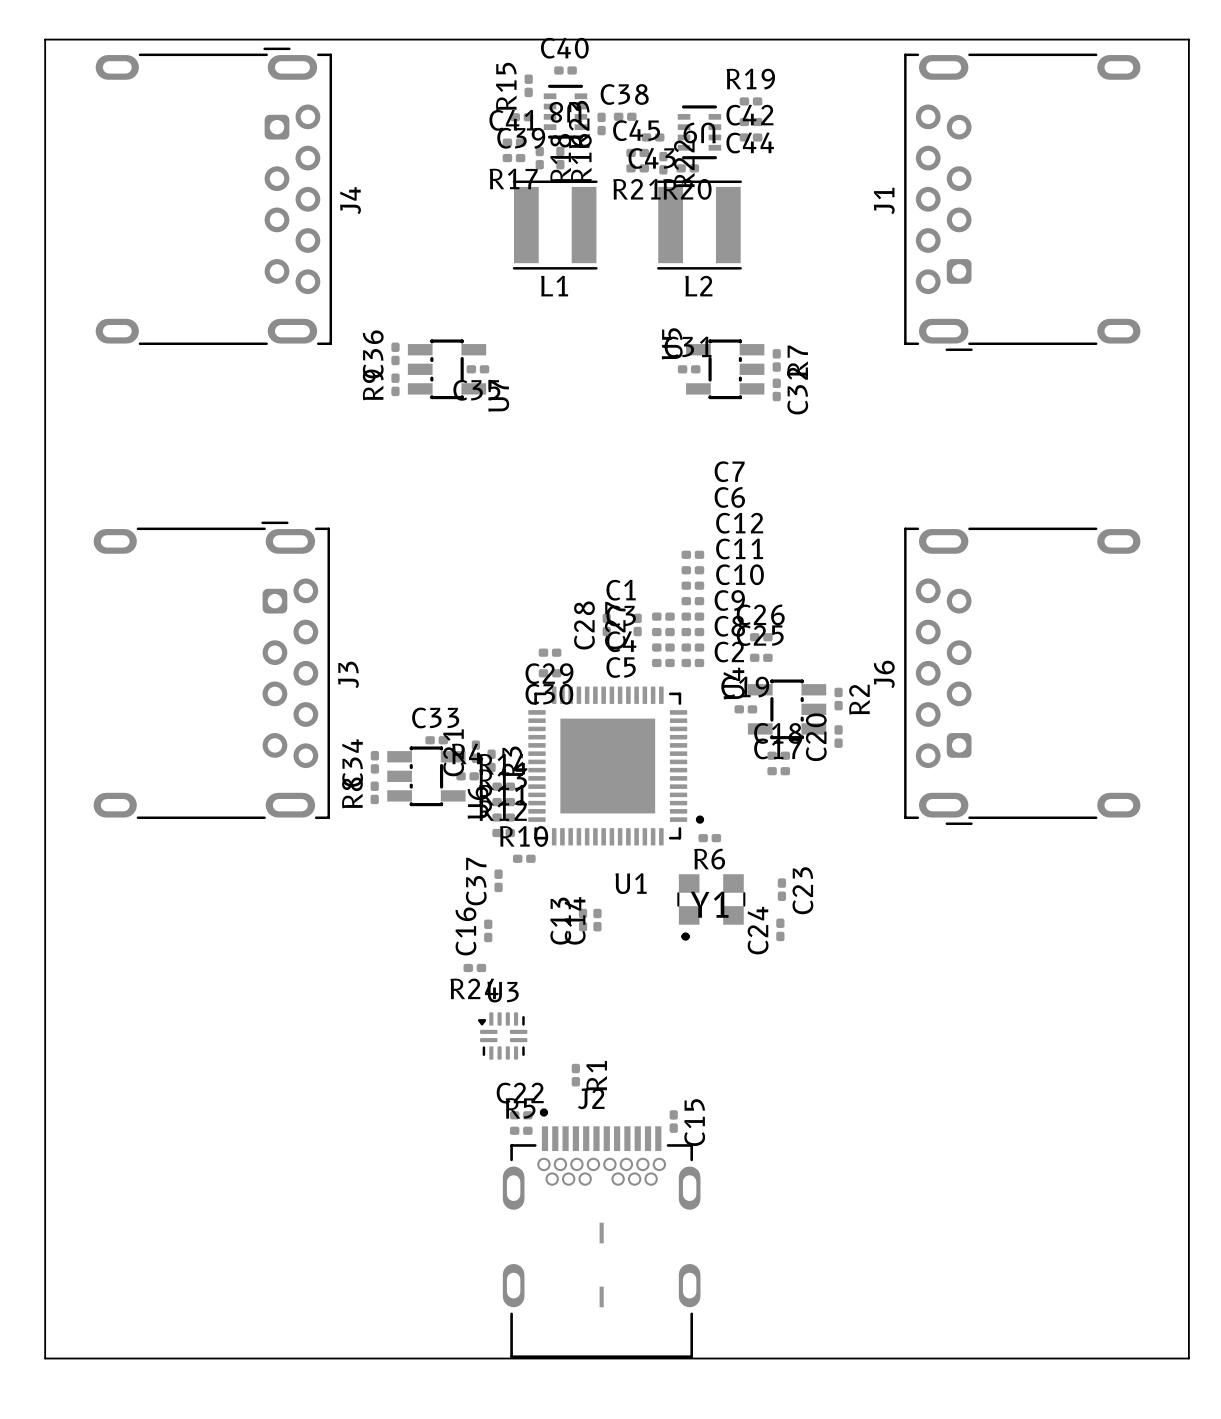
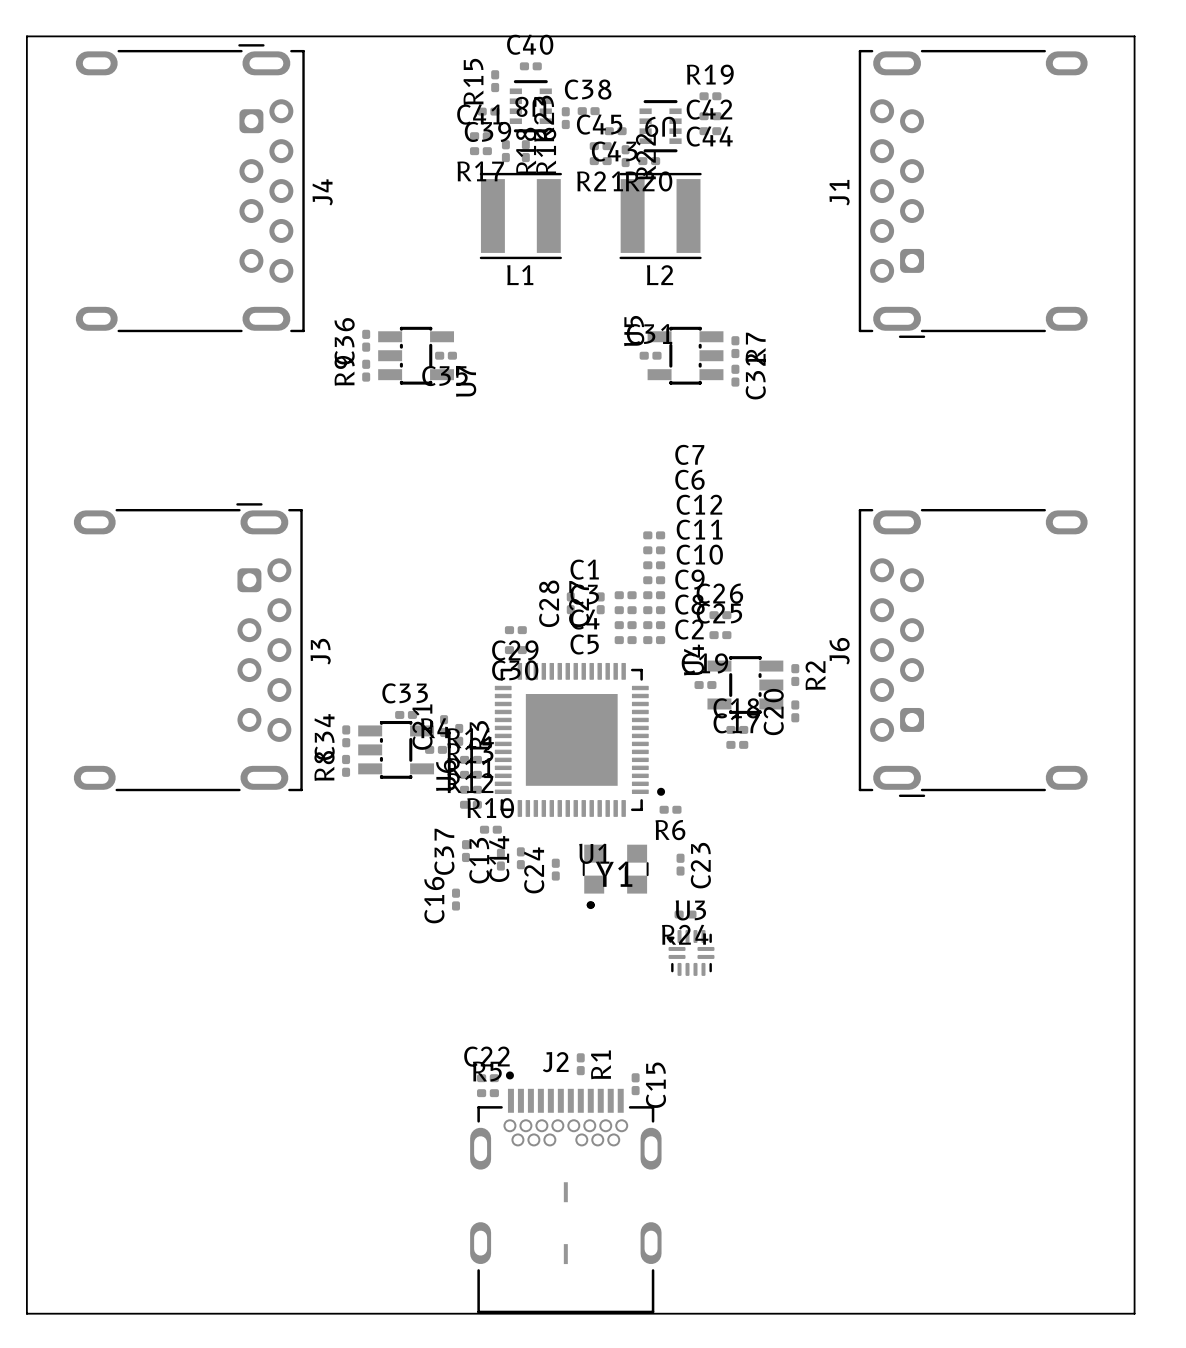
C23 position: (781, 889) -> (680, 864)
Y1 position: (711, 907) -> (615, 876)
C13 position: (583, 920) -> (500, 859)
C14 position: (597, 920) -> (520, 858)
C24 position: (780, 929) -> (555, 869)
R24 position: (474, 967) -> (685, 914)
U3 position: (502, 1035) -> (690, 952)
R1 position: (575, 1075) -> (580, 1064)

